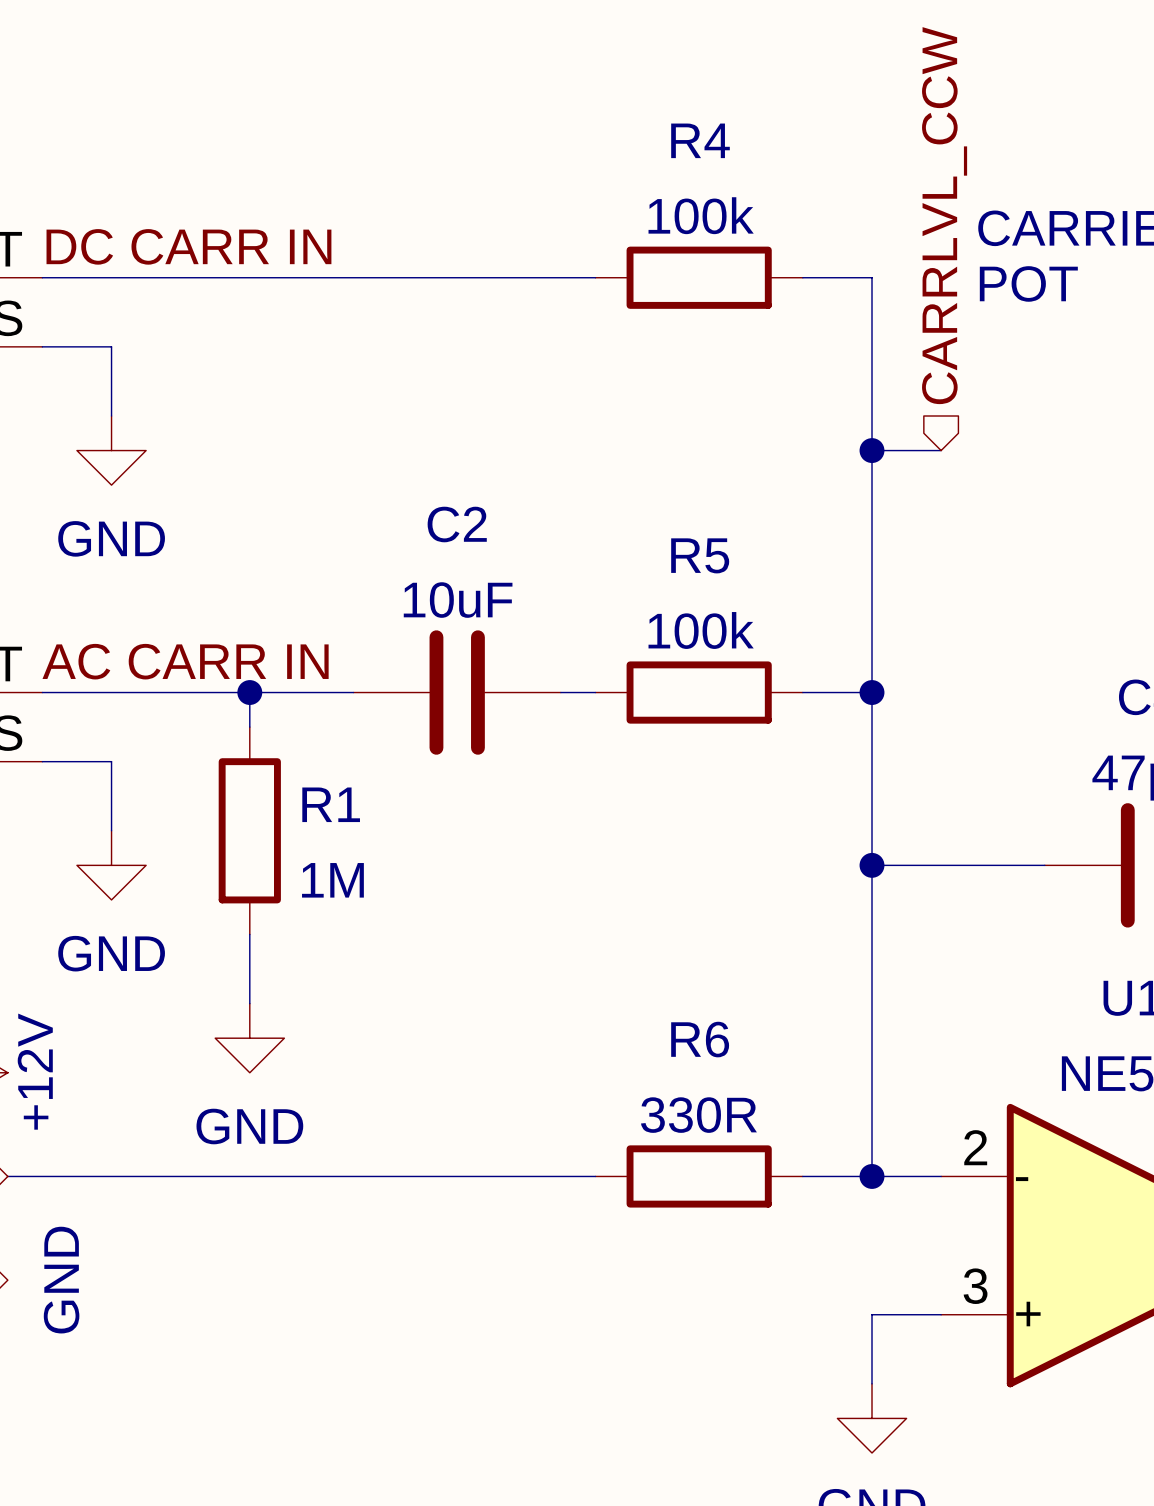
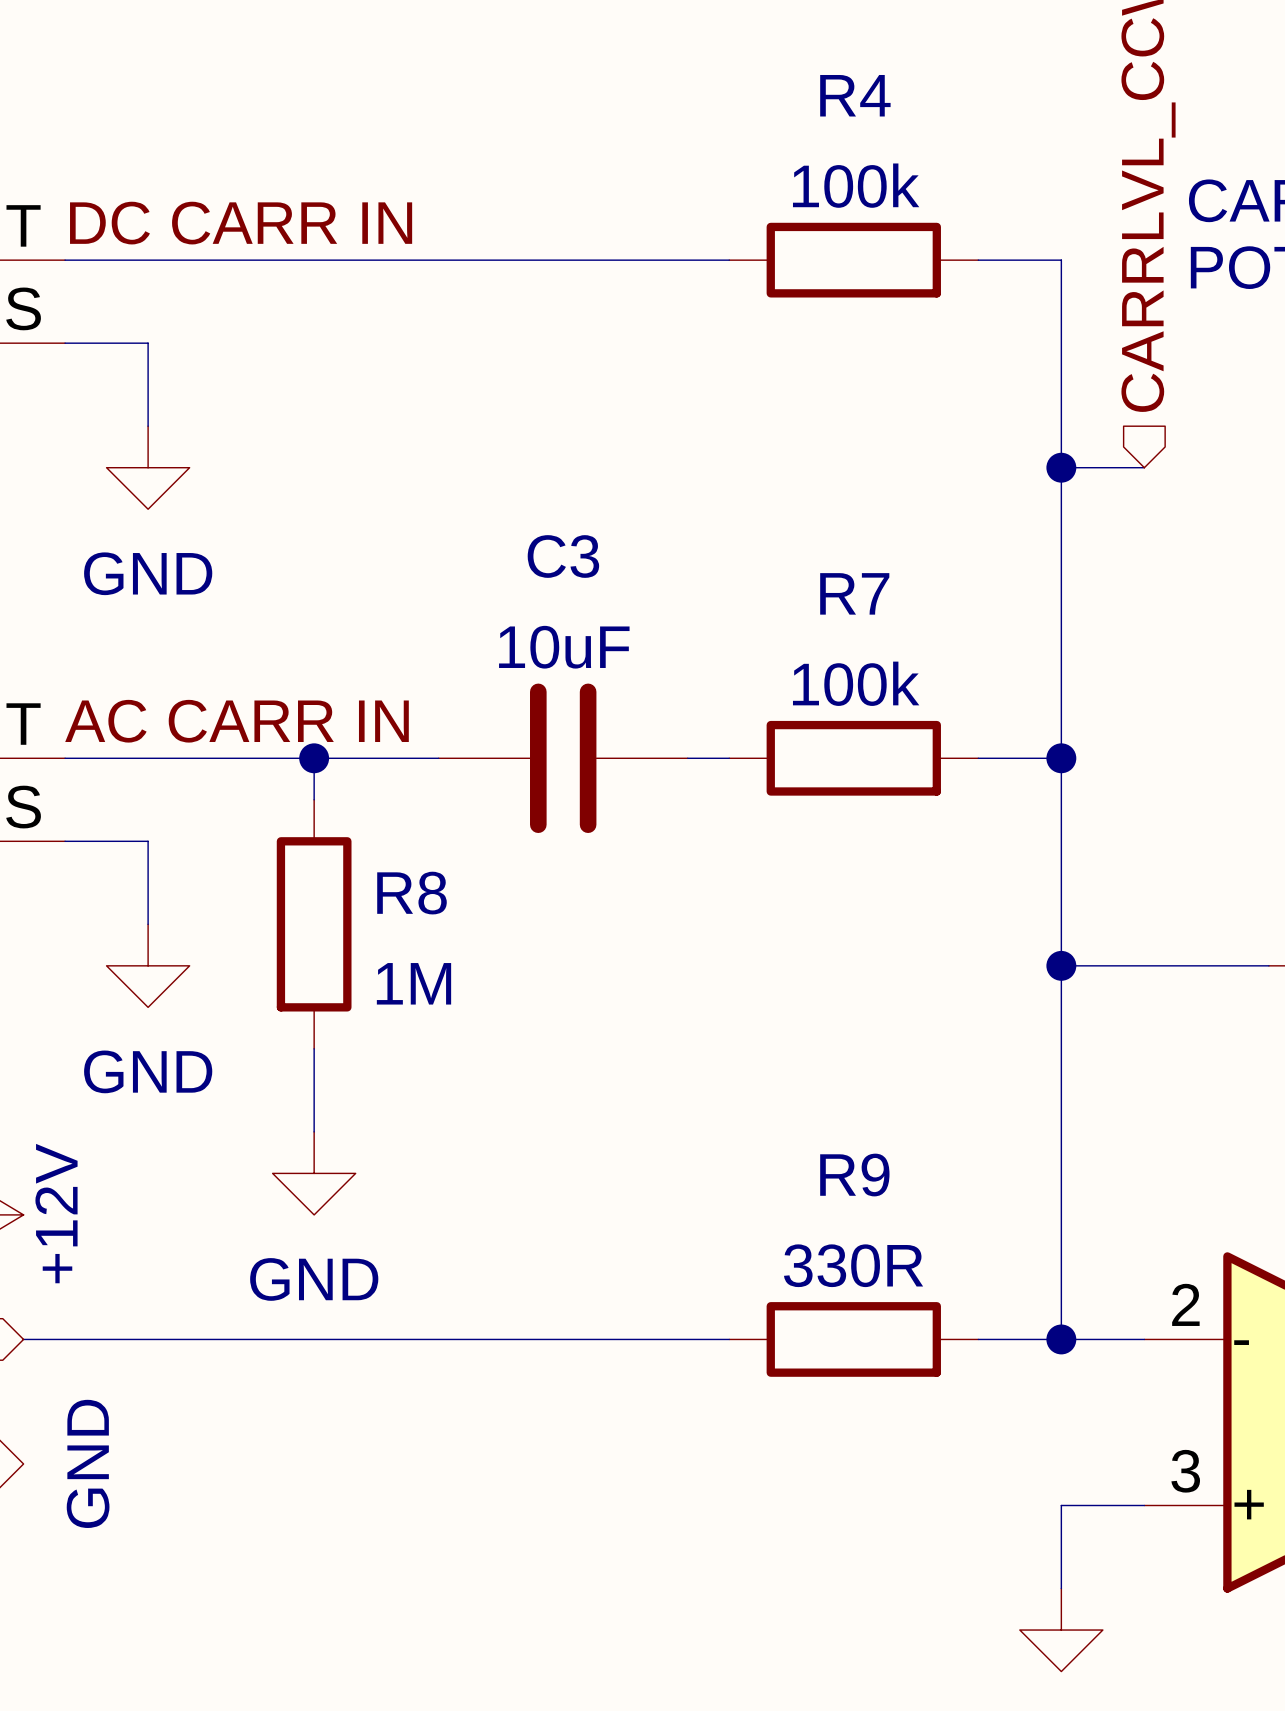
C2 name: C2 (457, 524) -> C3 (563, 556)
R5 name: R5 (700, 555) -> R7 (854, 593)
R1 name: R1 (331, 804) -> R8 (411, 893)
R6 name: R6 (700, 1039) -> R9 (854, 1175)

